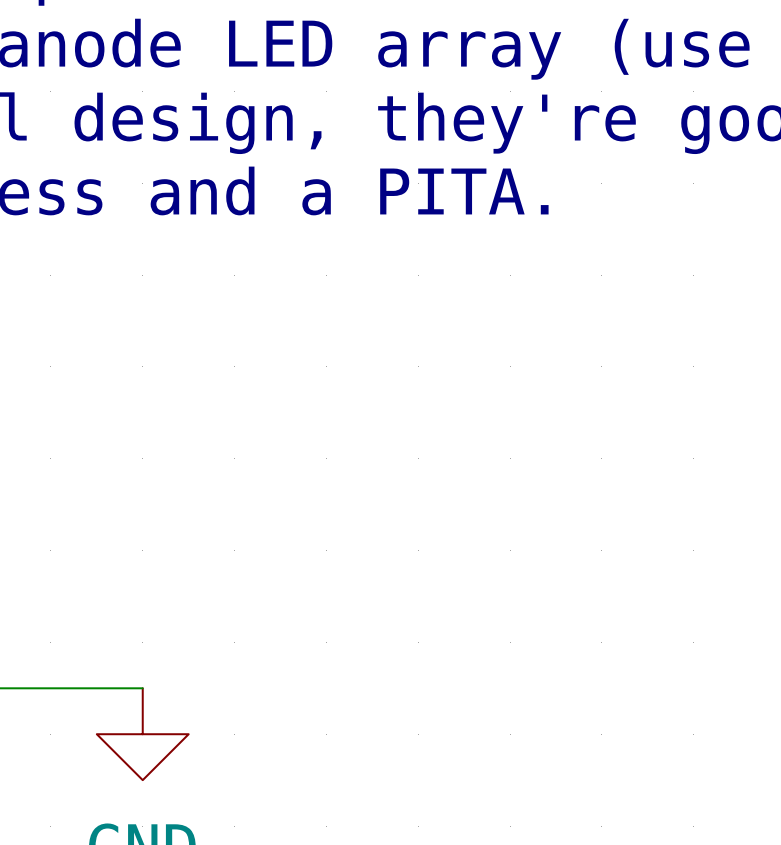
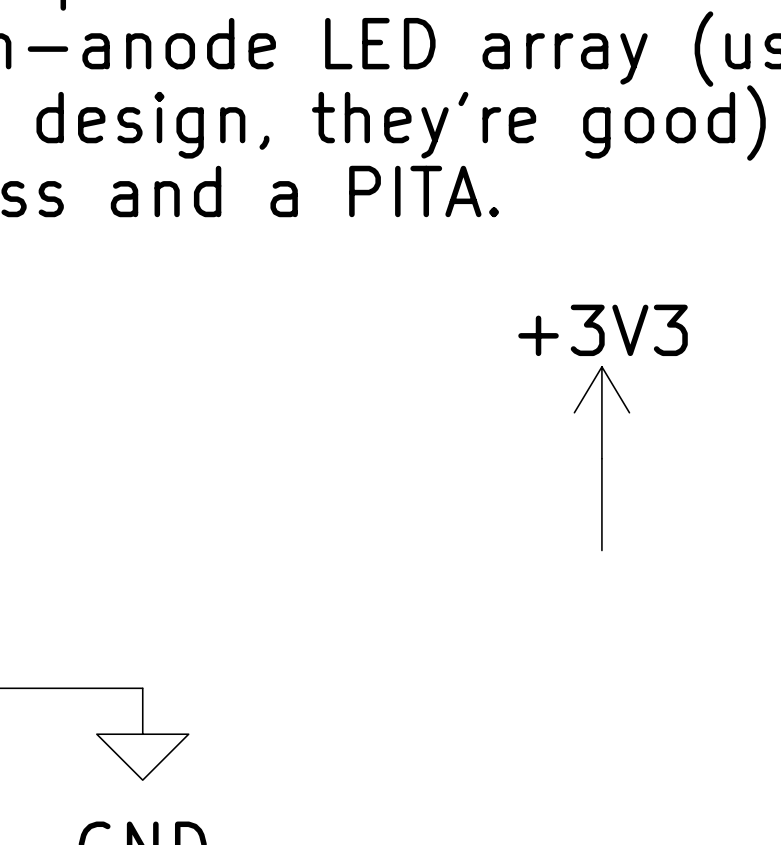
power symbol: none -> +3V3 (601, 412)
wire: none -> (601, 458) (601, 550)

